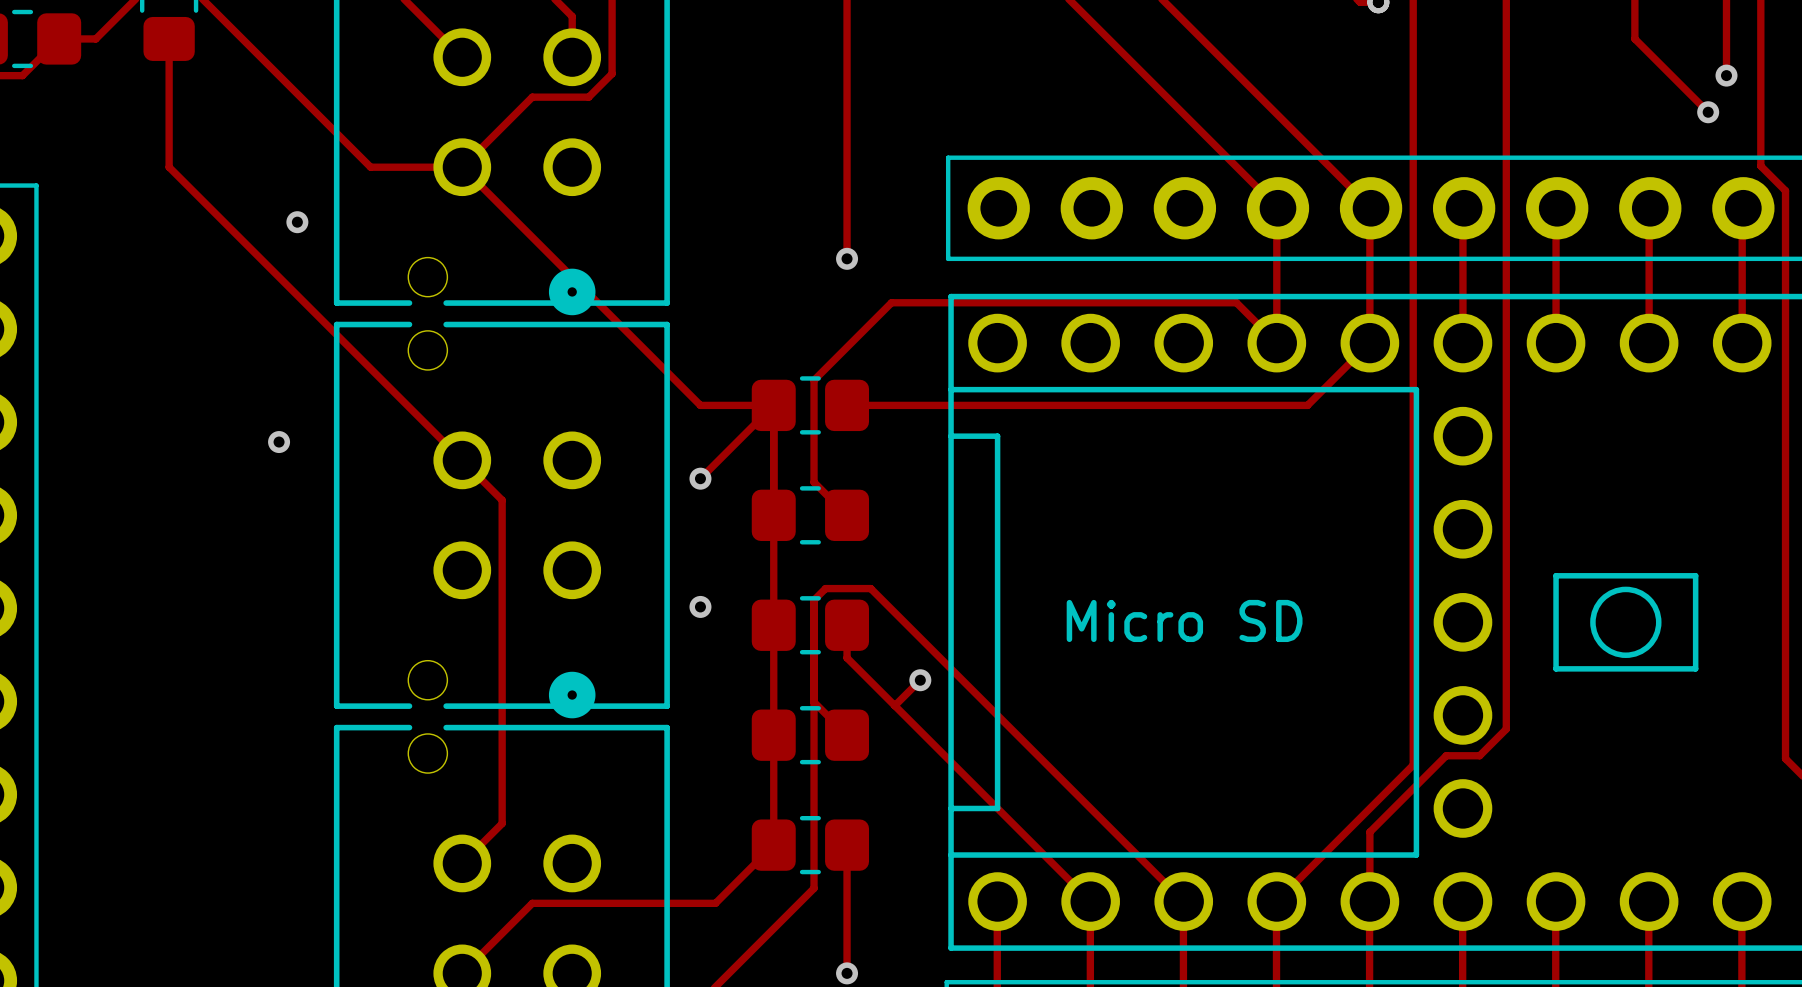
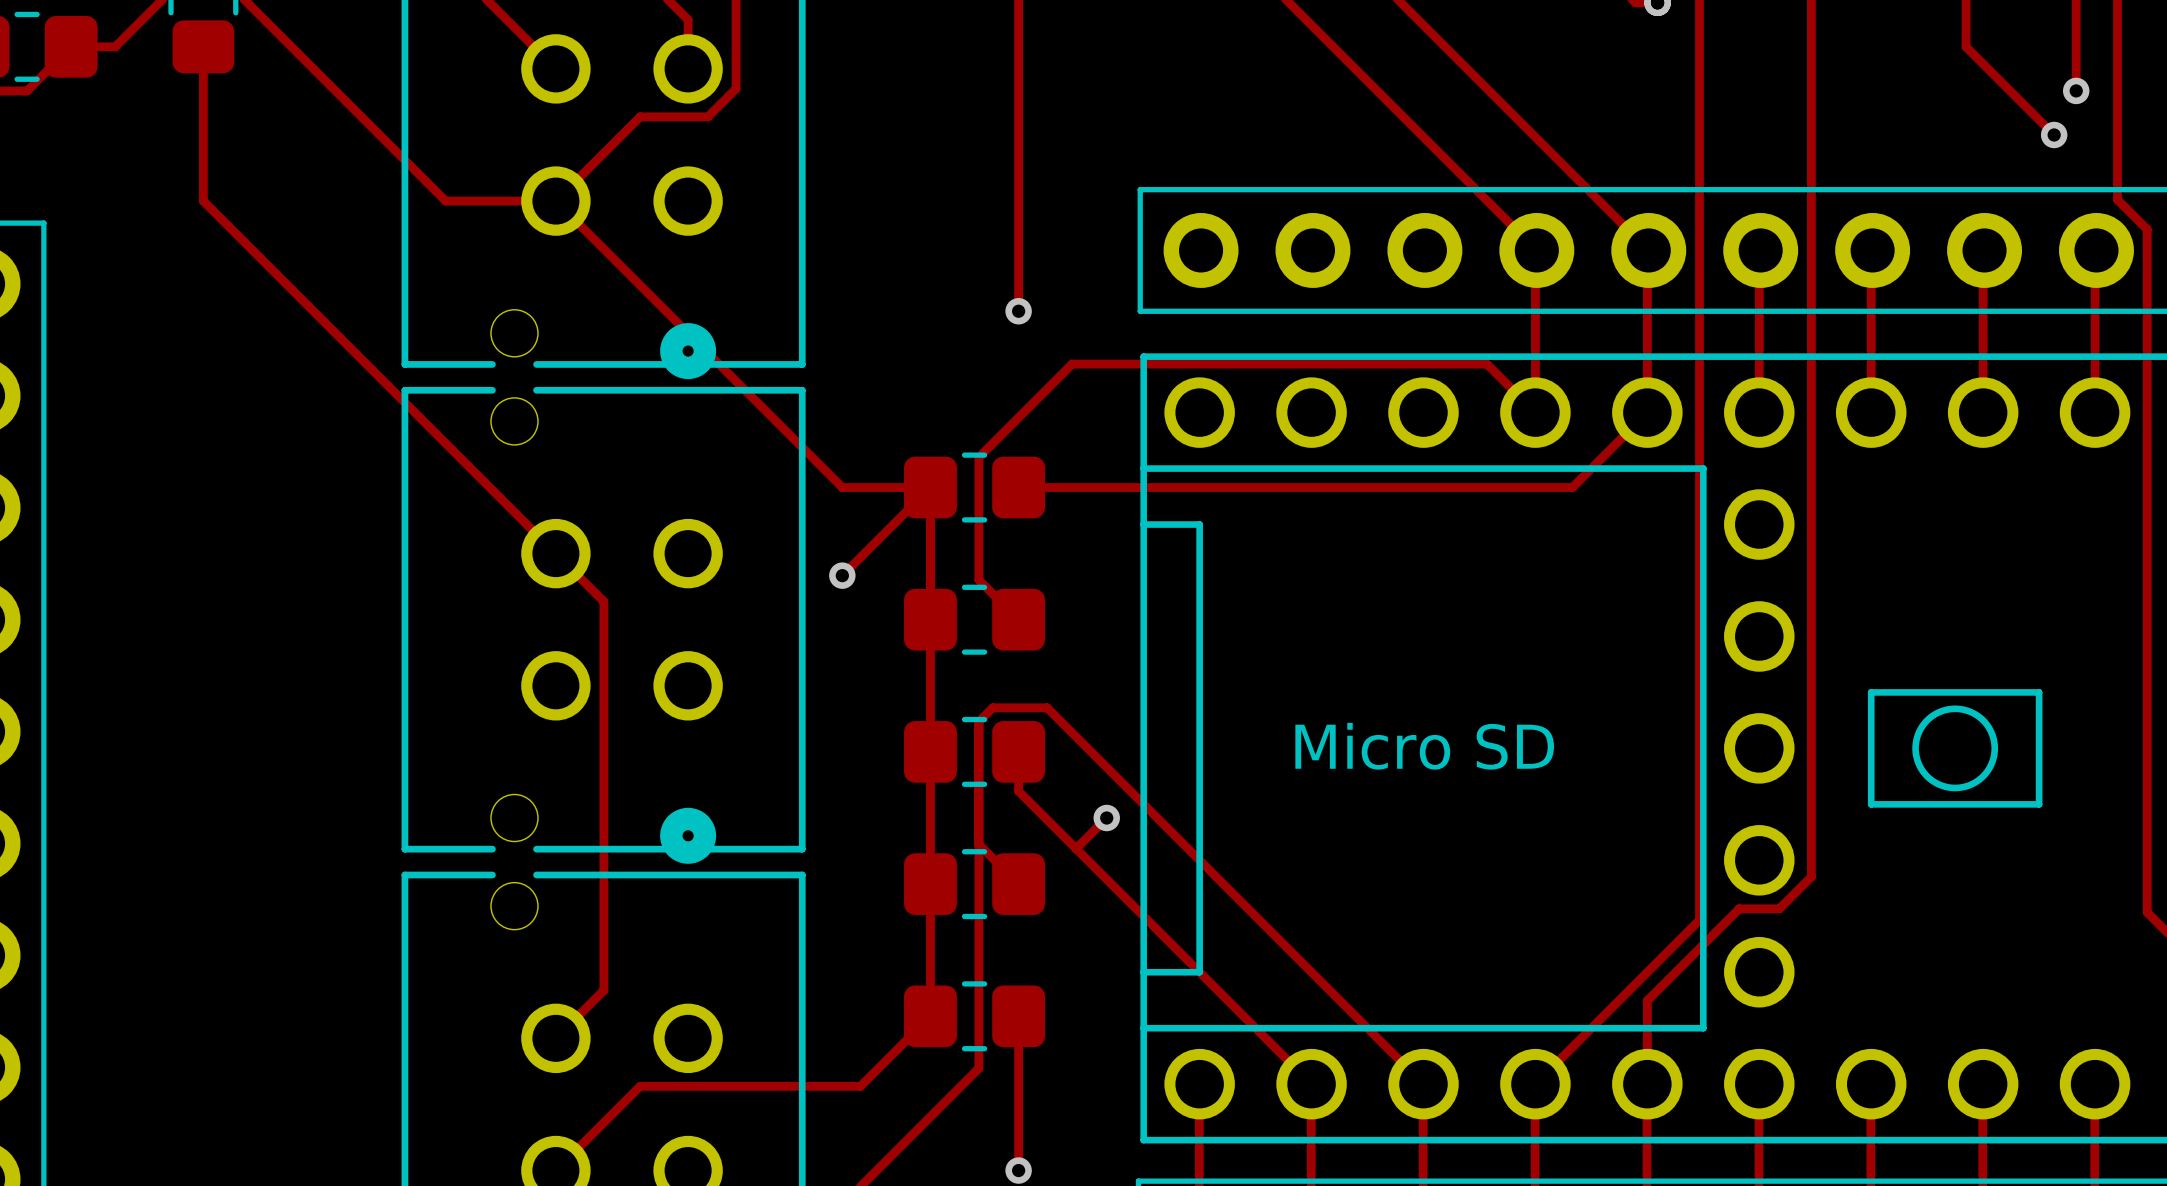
via: (297, 222) -> none
via: (279, 442) -> none
via: (700, 606) -> none

